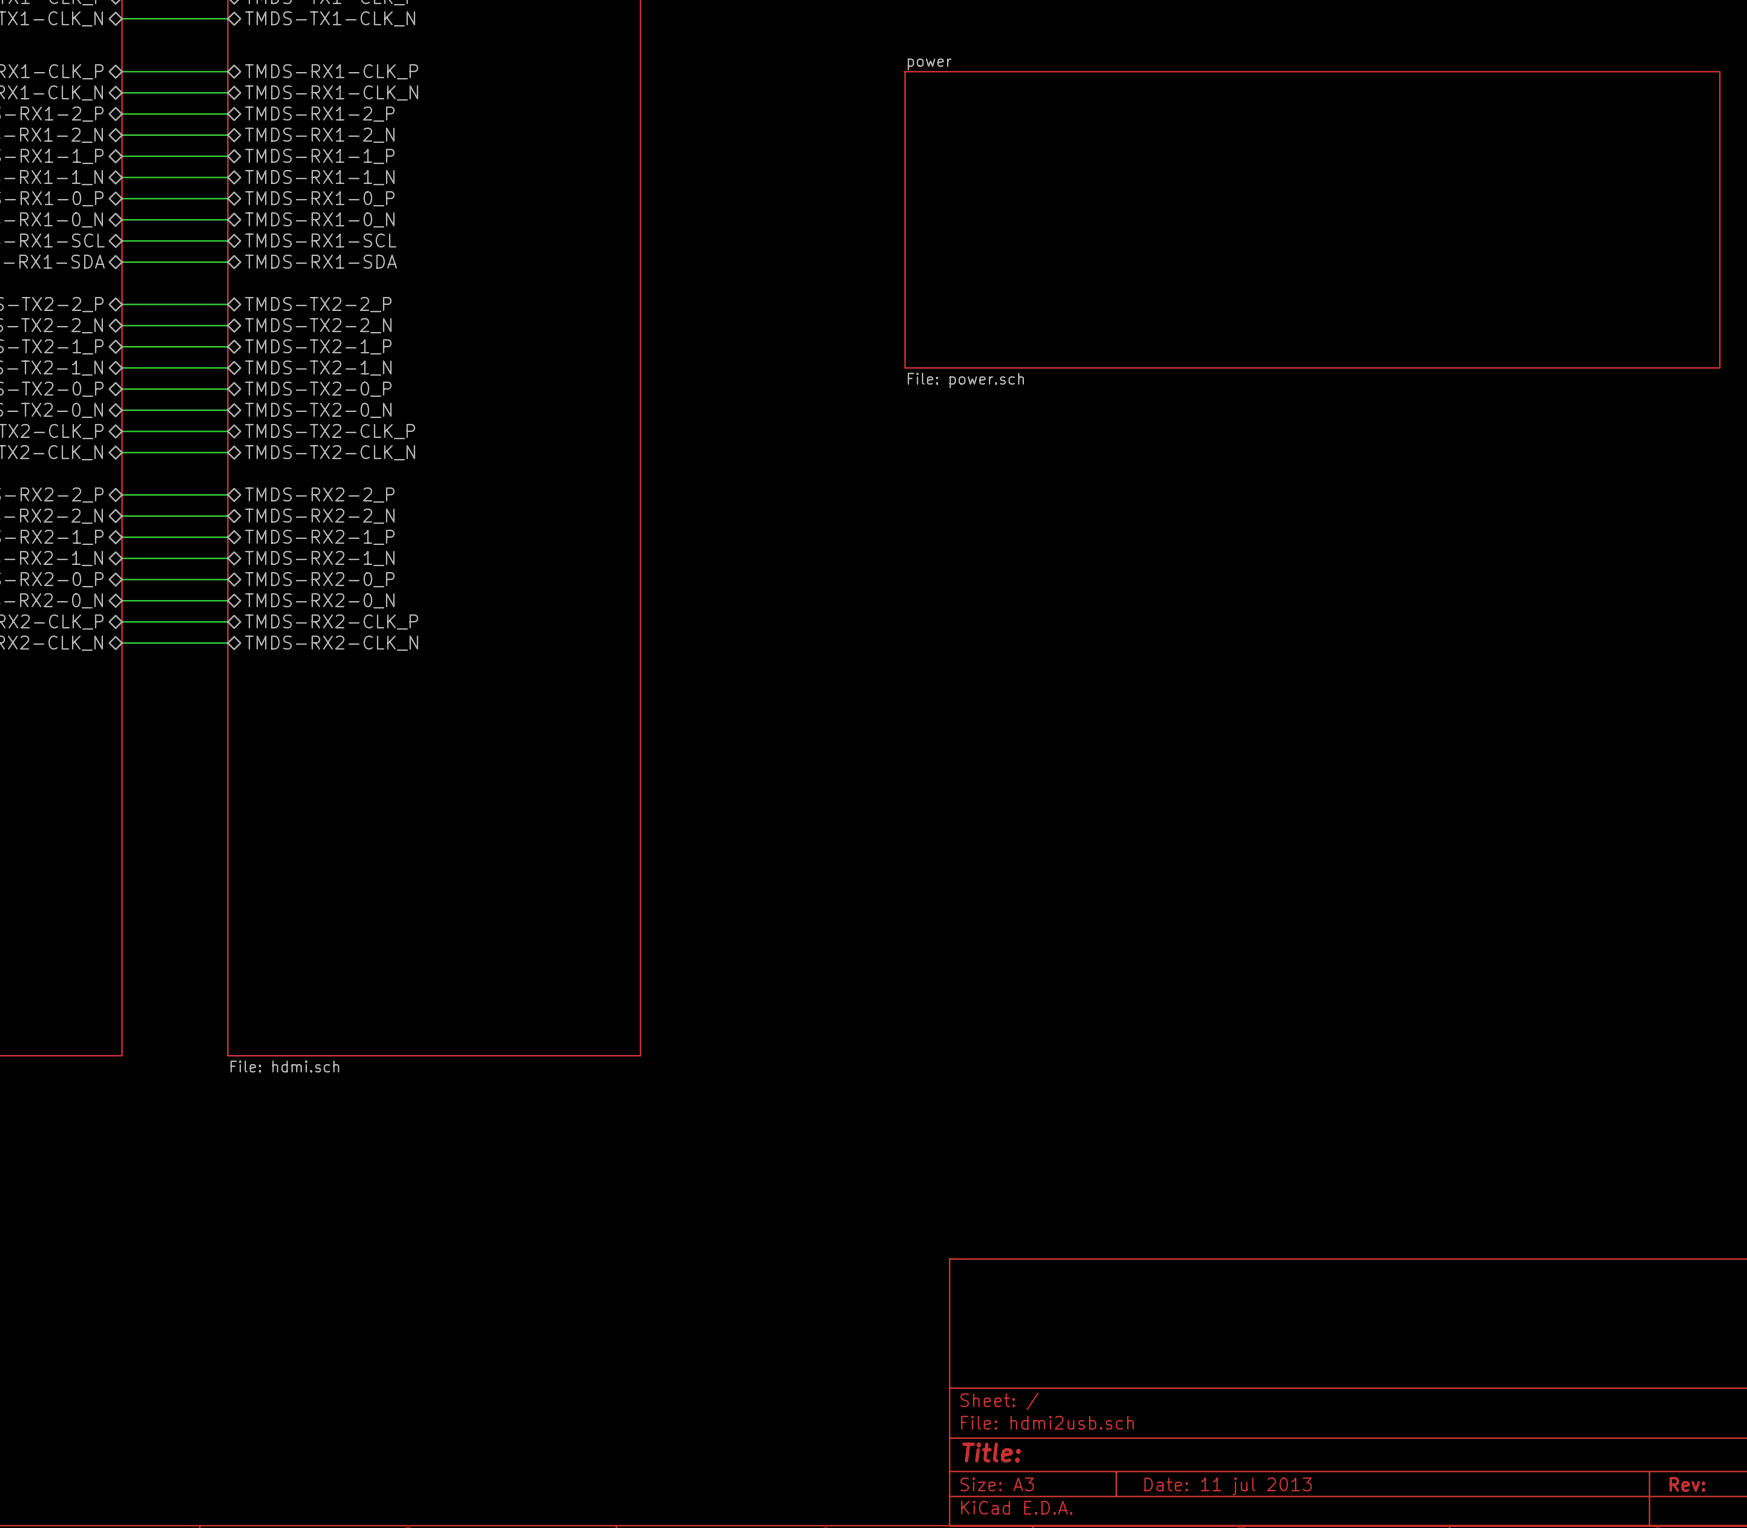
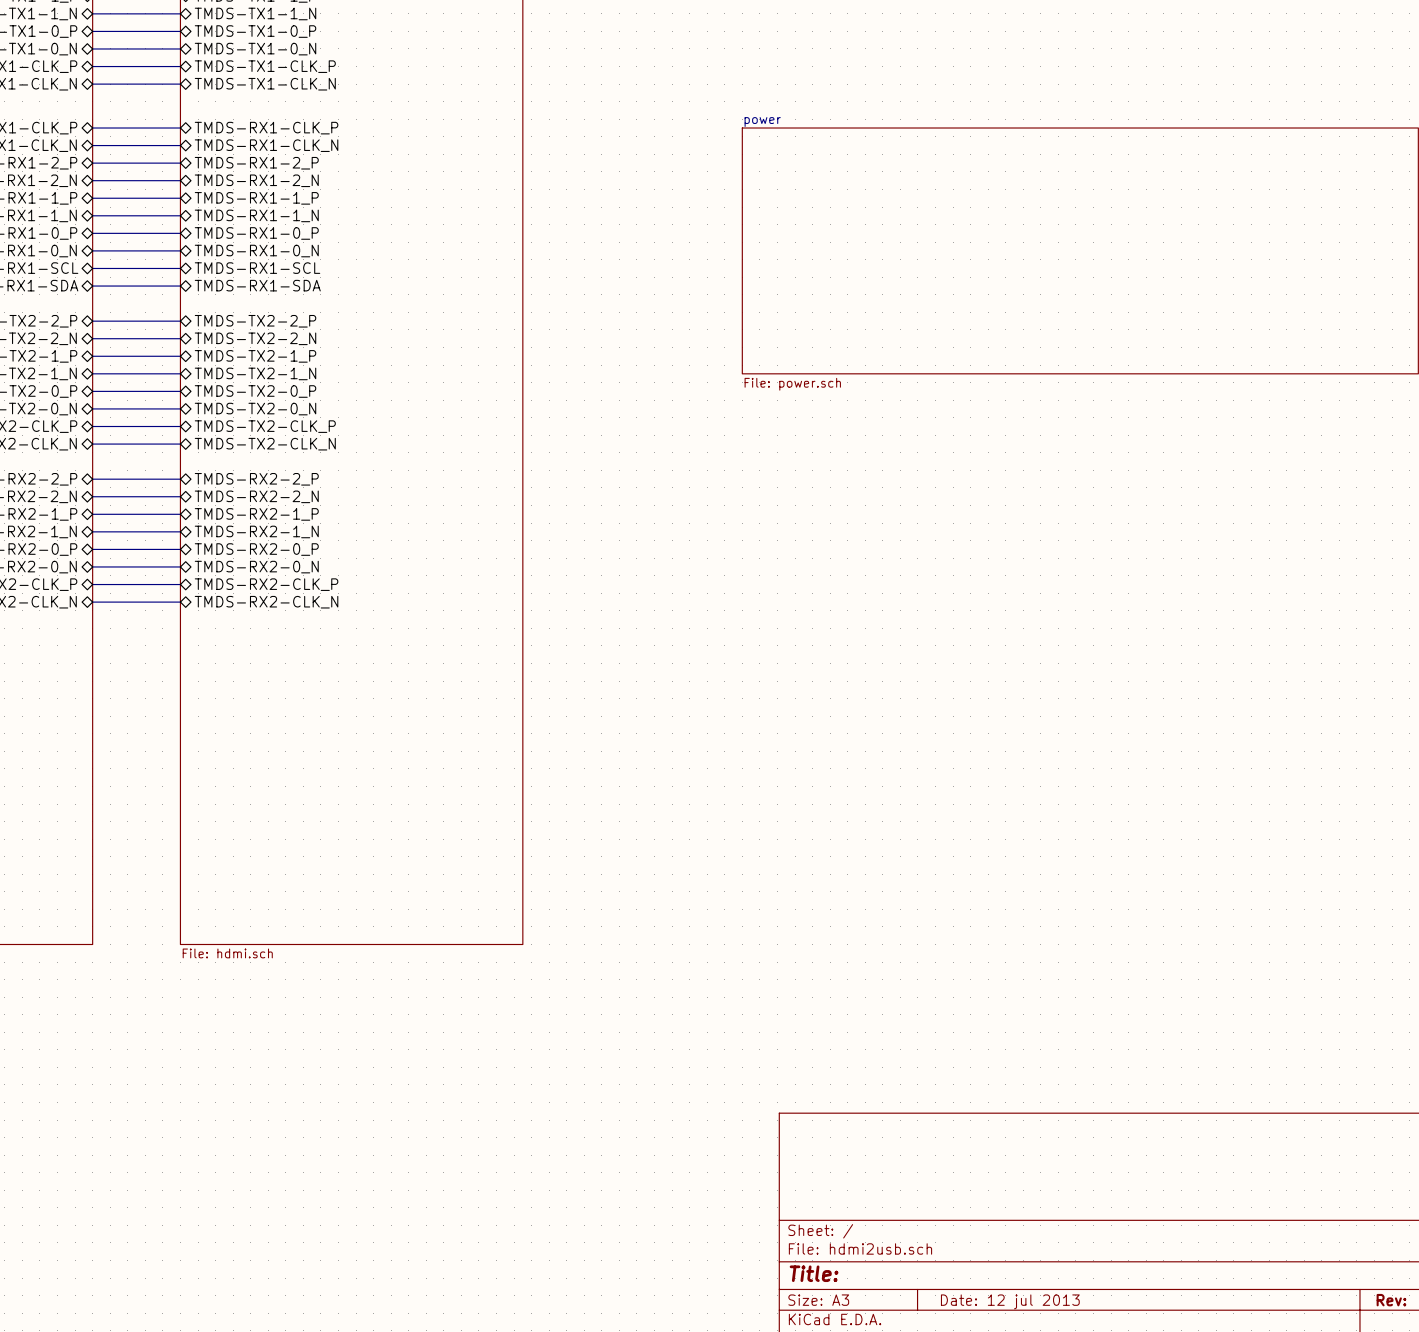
title block: Date: 11 jul 2013 (1228, 1486) -> Date: 12 jul 2013 (1010, 1301)

